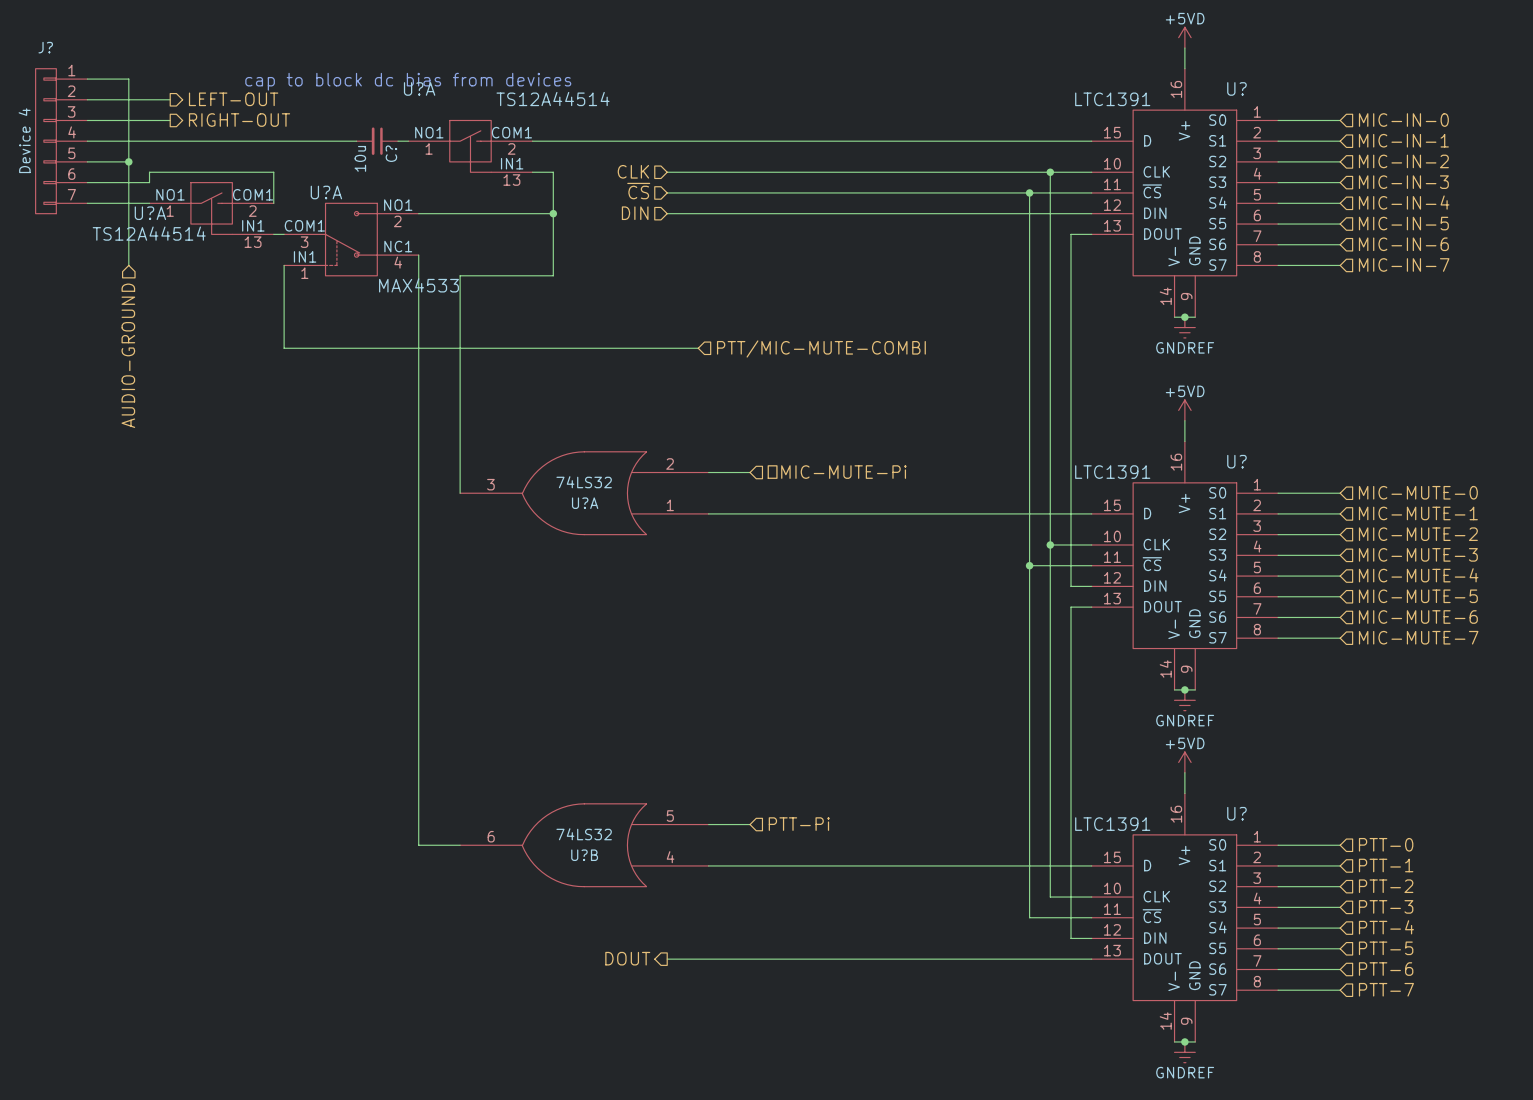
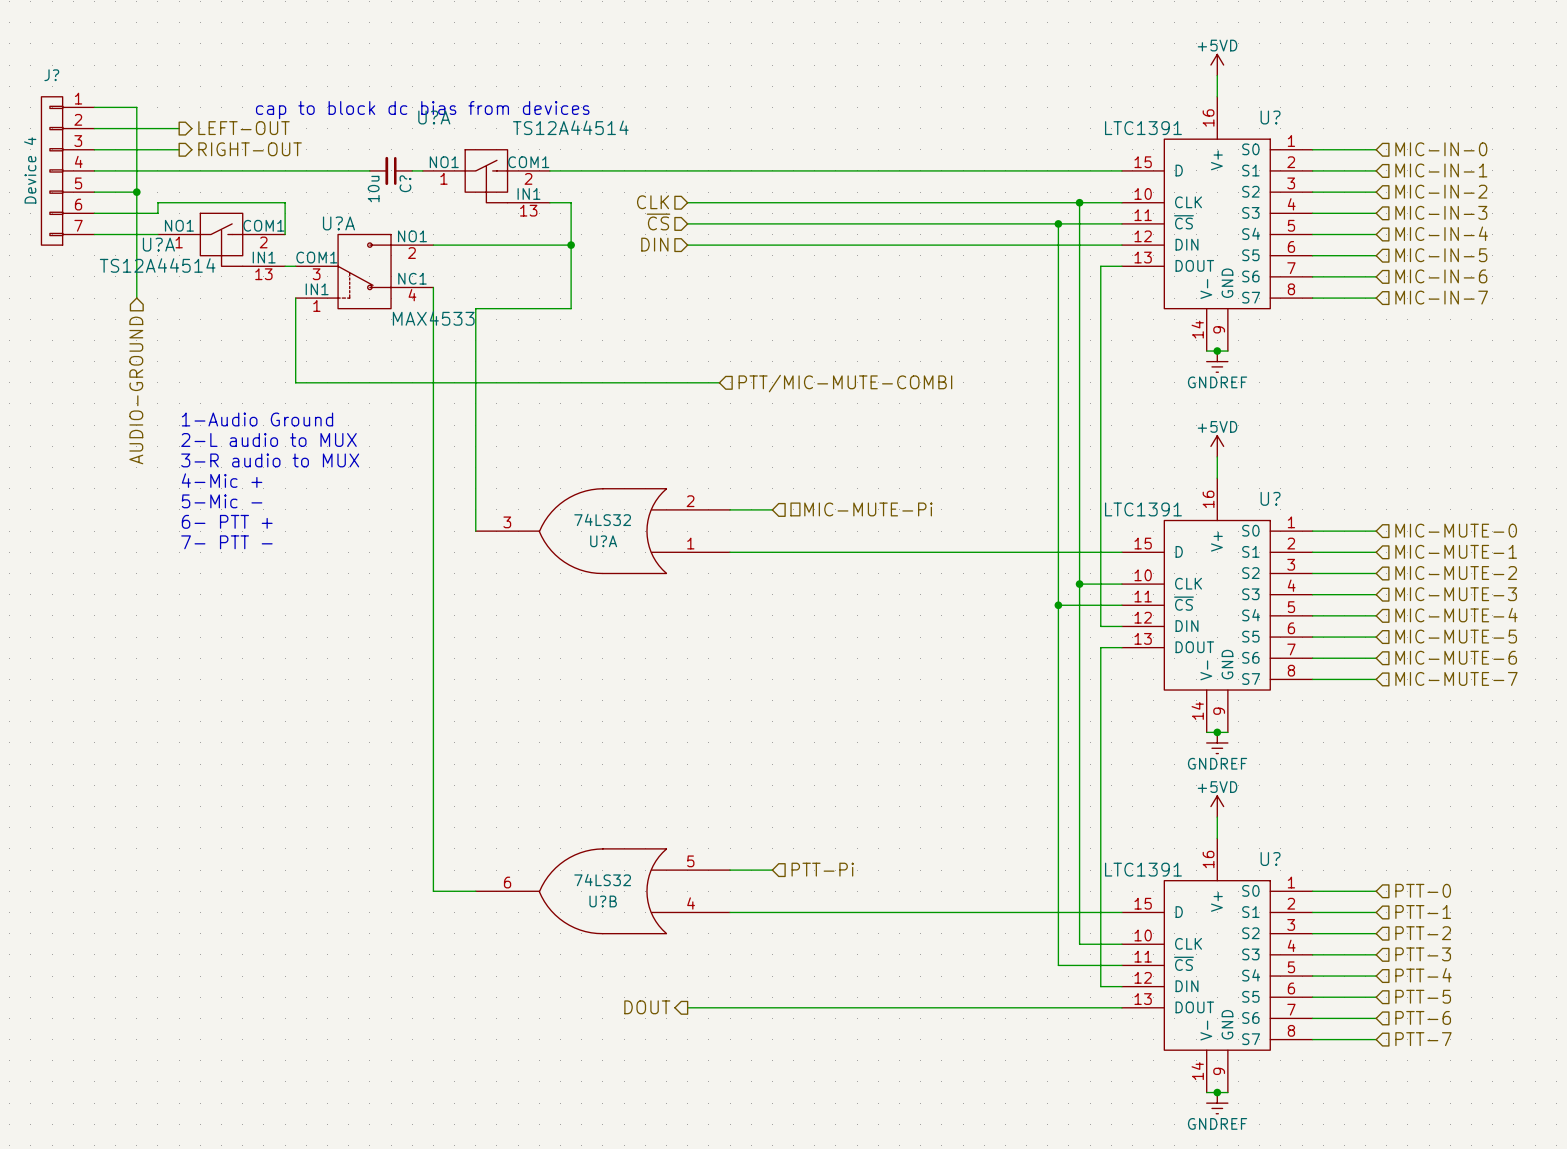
text: none -> 1-Audio Ground (257, 419)
text: none -> 2-L audio to MUX (268, 439)
text: none -> 3-R audio to MUX (270, 460)
text: none -> 4-Mic + (222, 480)
text: none -> 5-Mic - (222, 501)
text: none -> 6- PTT + (227, 521)
text: none -> 7- PTT - (226, 542)

